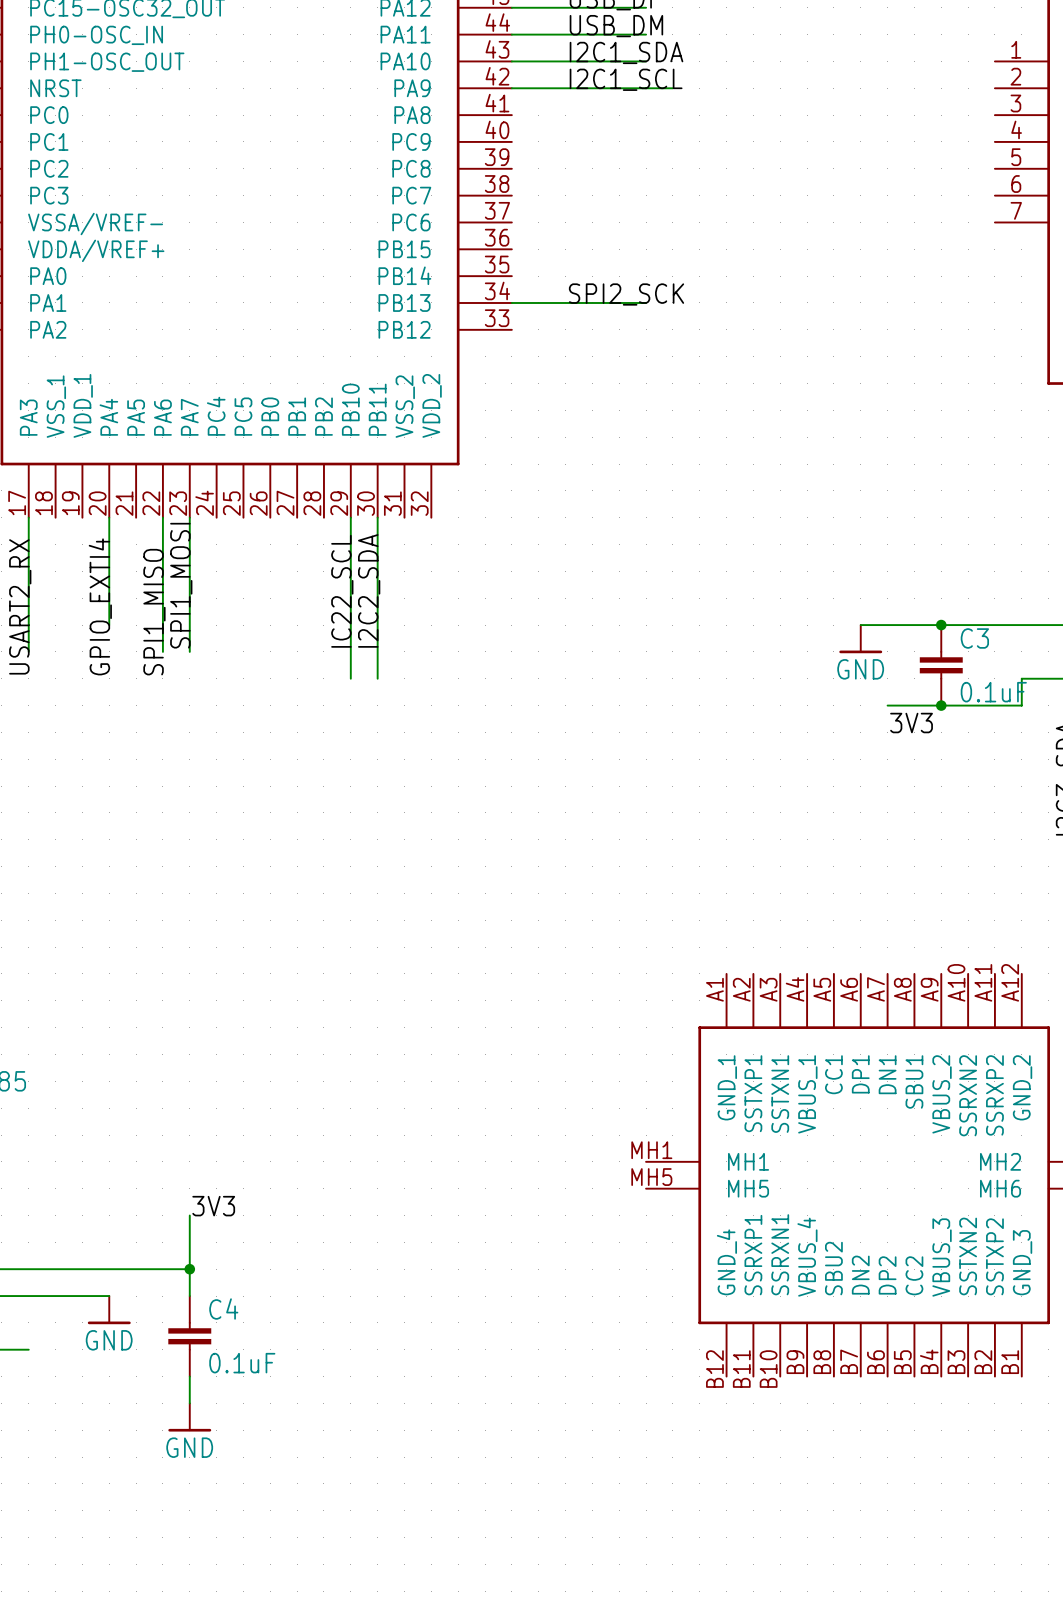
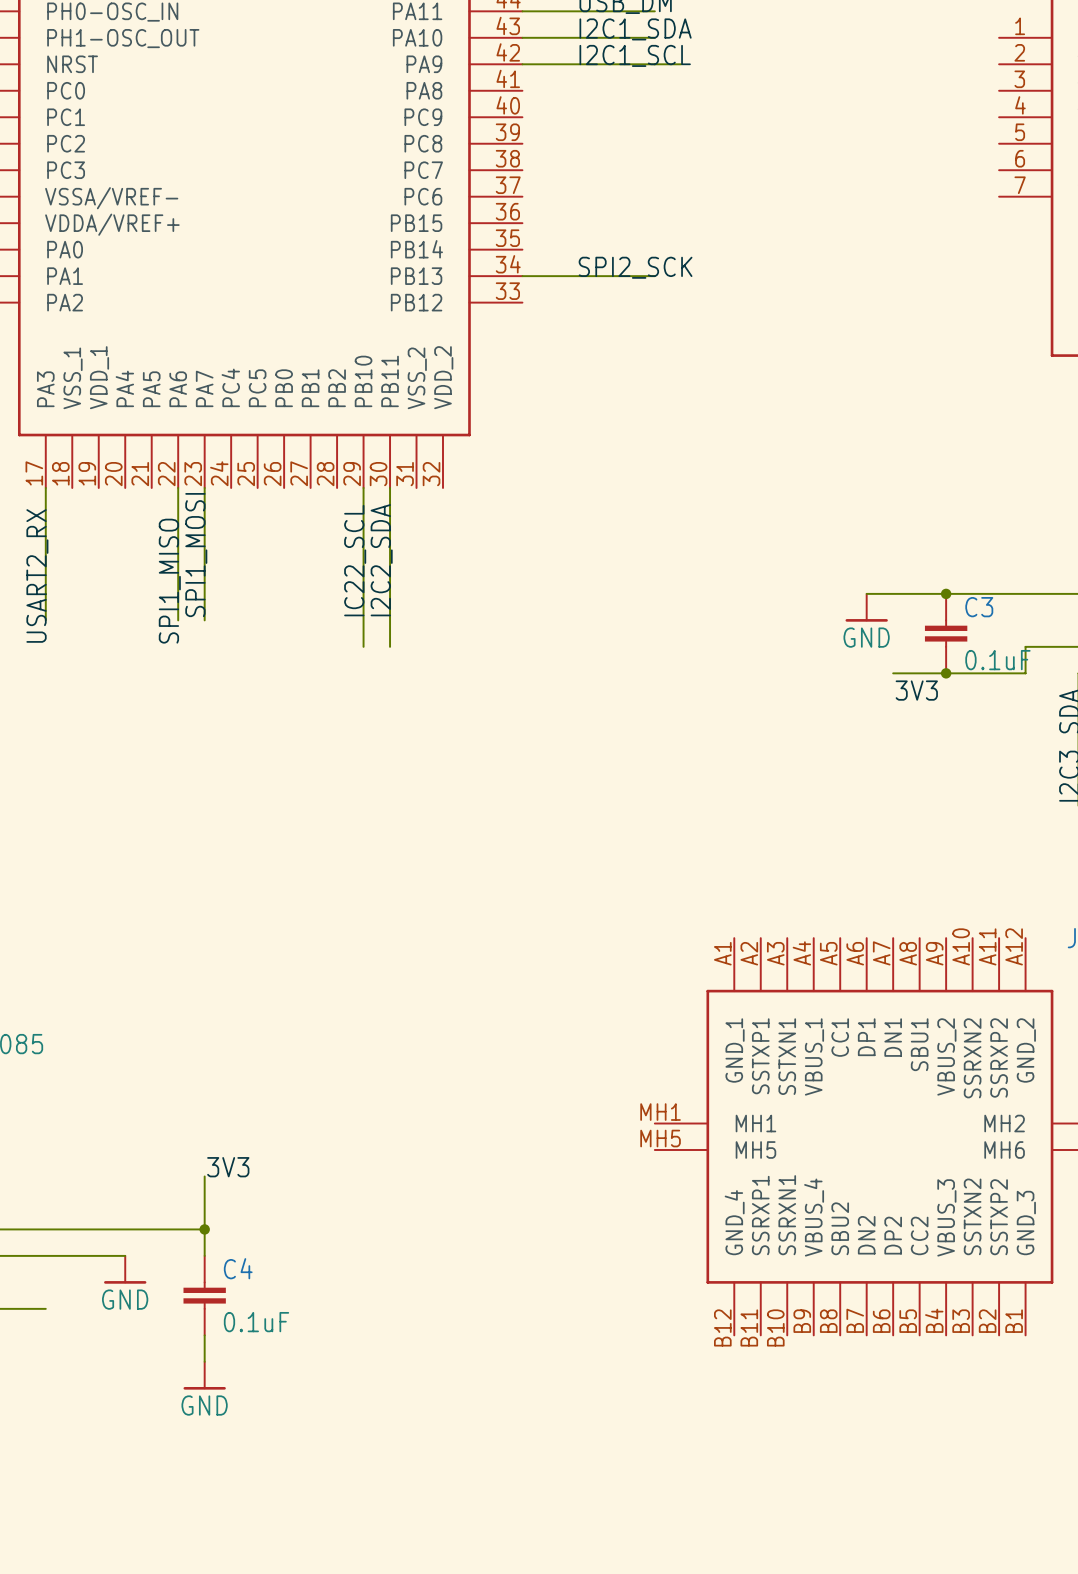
wire: (109, 517) (109, 625) -> none
label: GPIO_EXTI4 (100, 606) -> none

